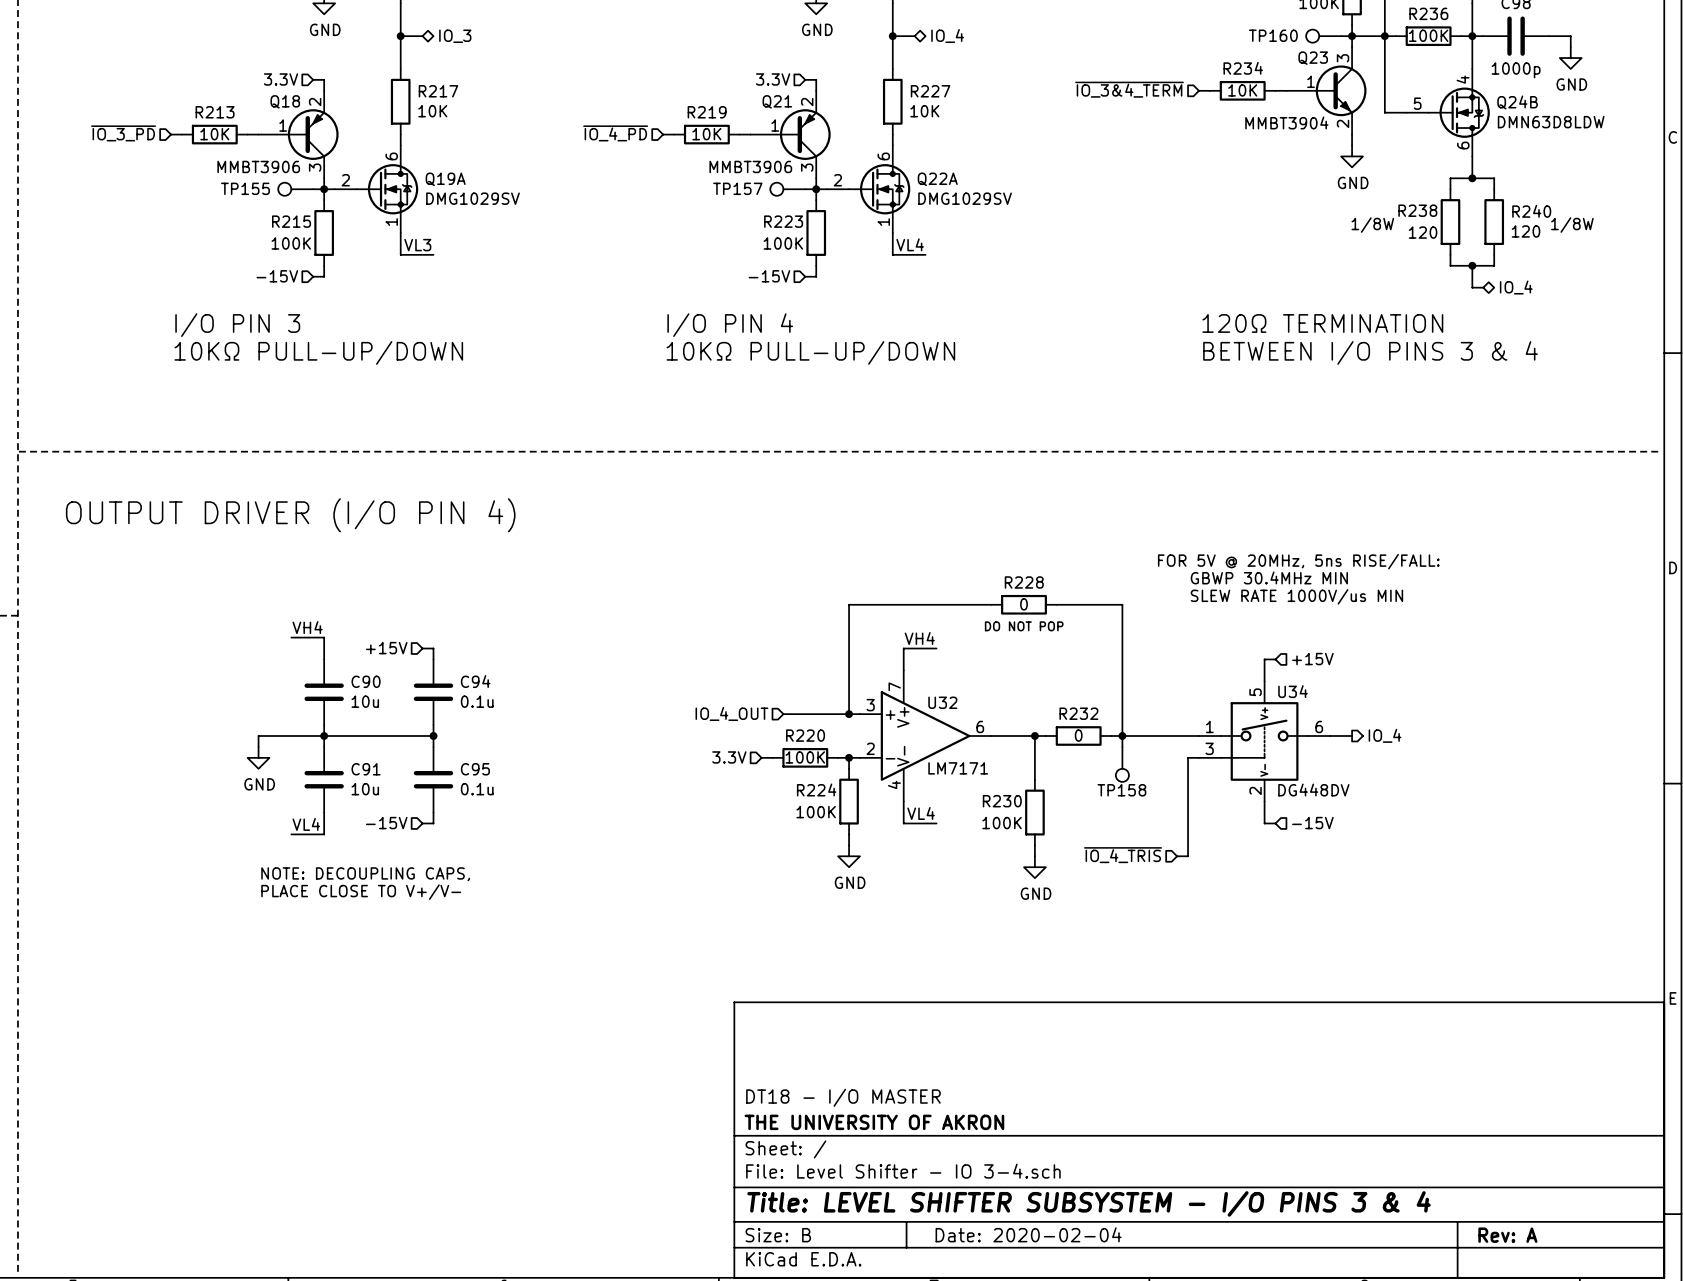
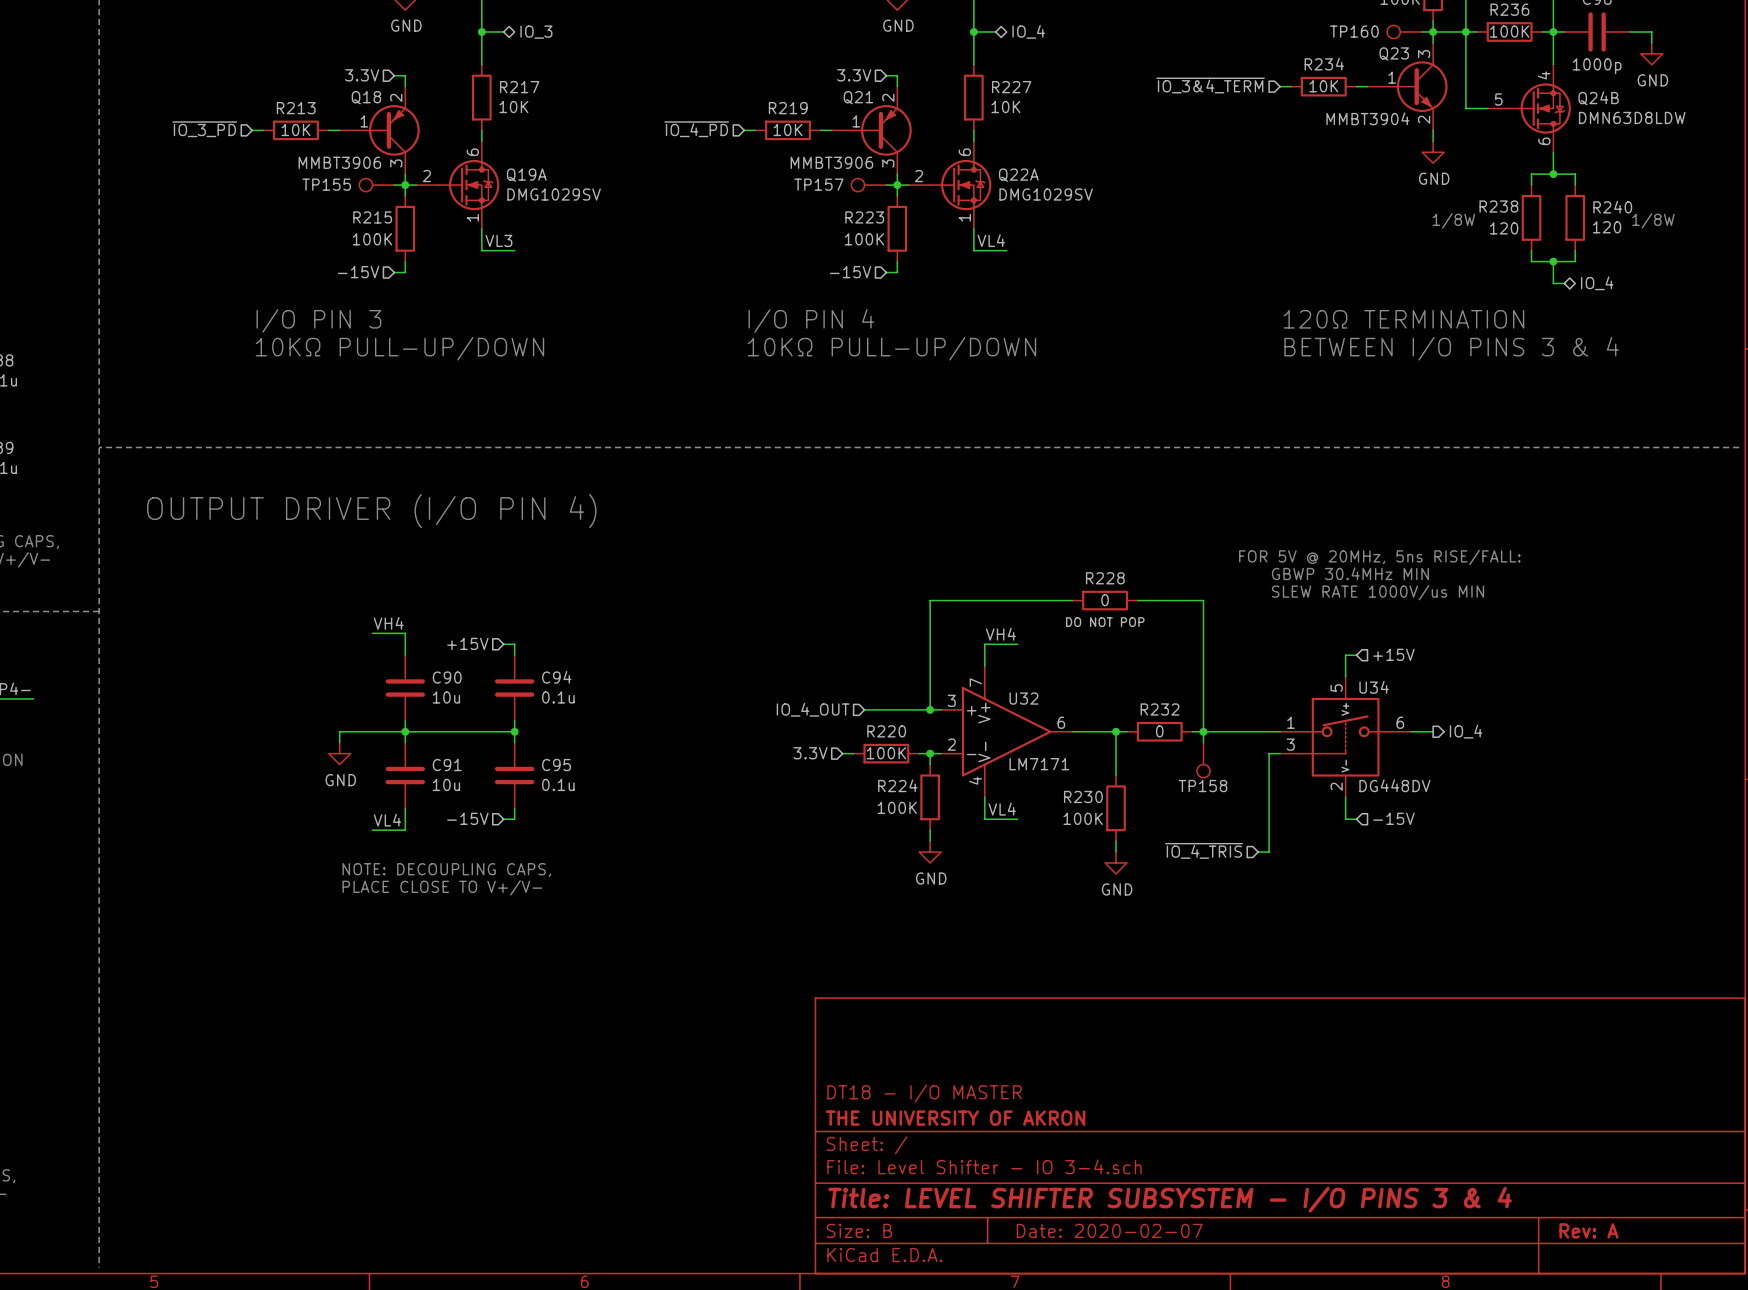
title block: Date: 2020-02-04 (1028, 1234) -> Date: 2020-02-07 (1109, 1230)

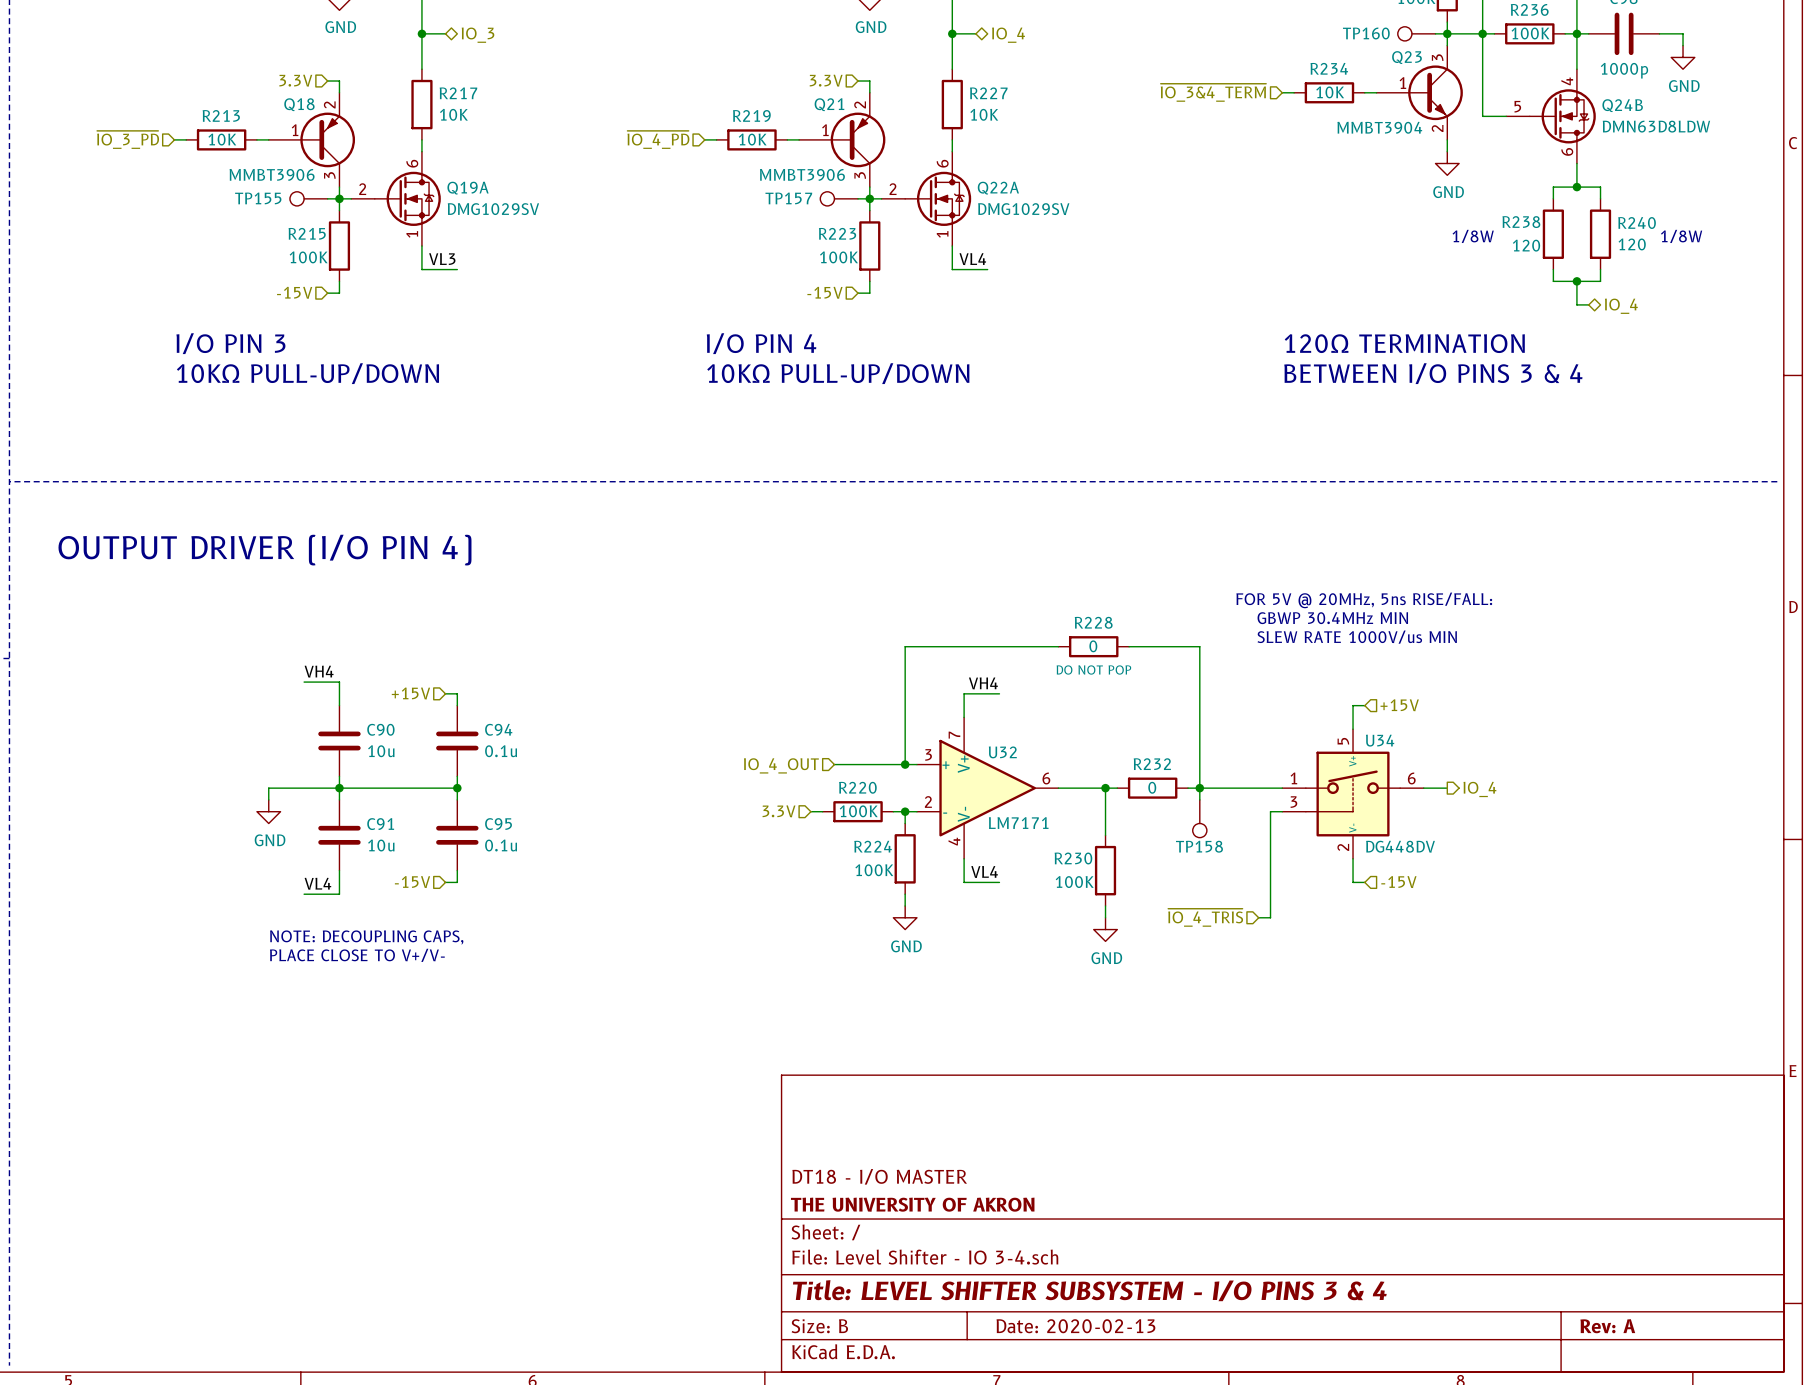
title block: Date: 2020-02-07 (1109, 1230) -> Date: 2020-02-13 (1075, 1326)

